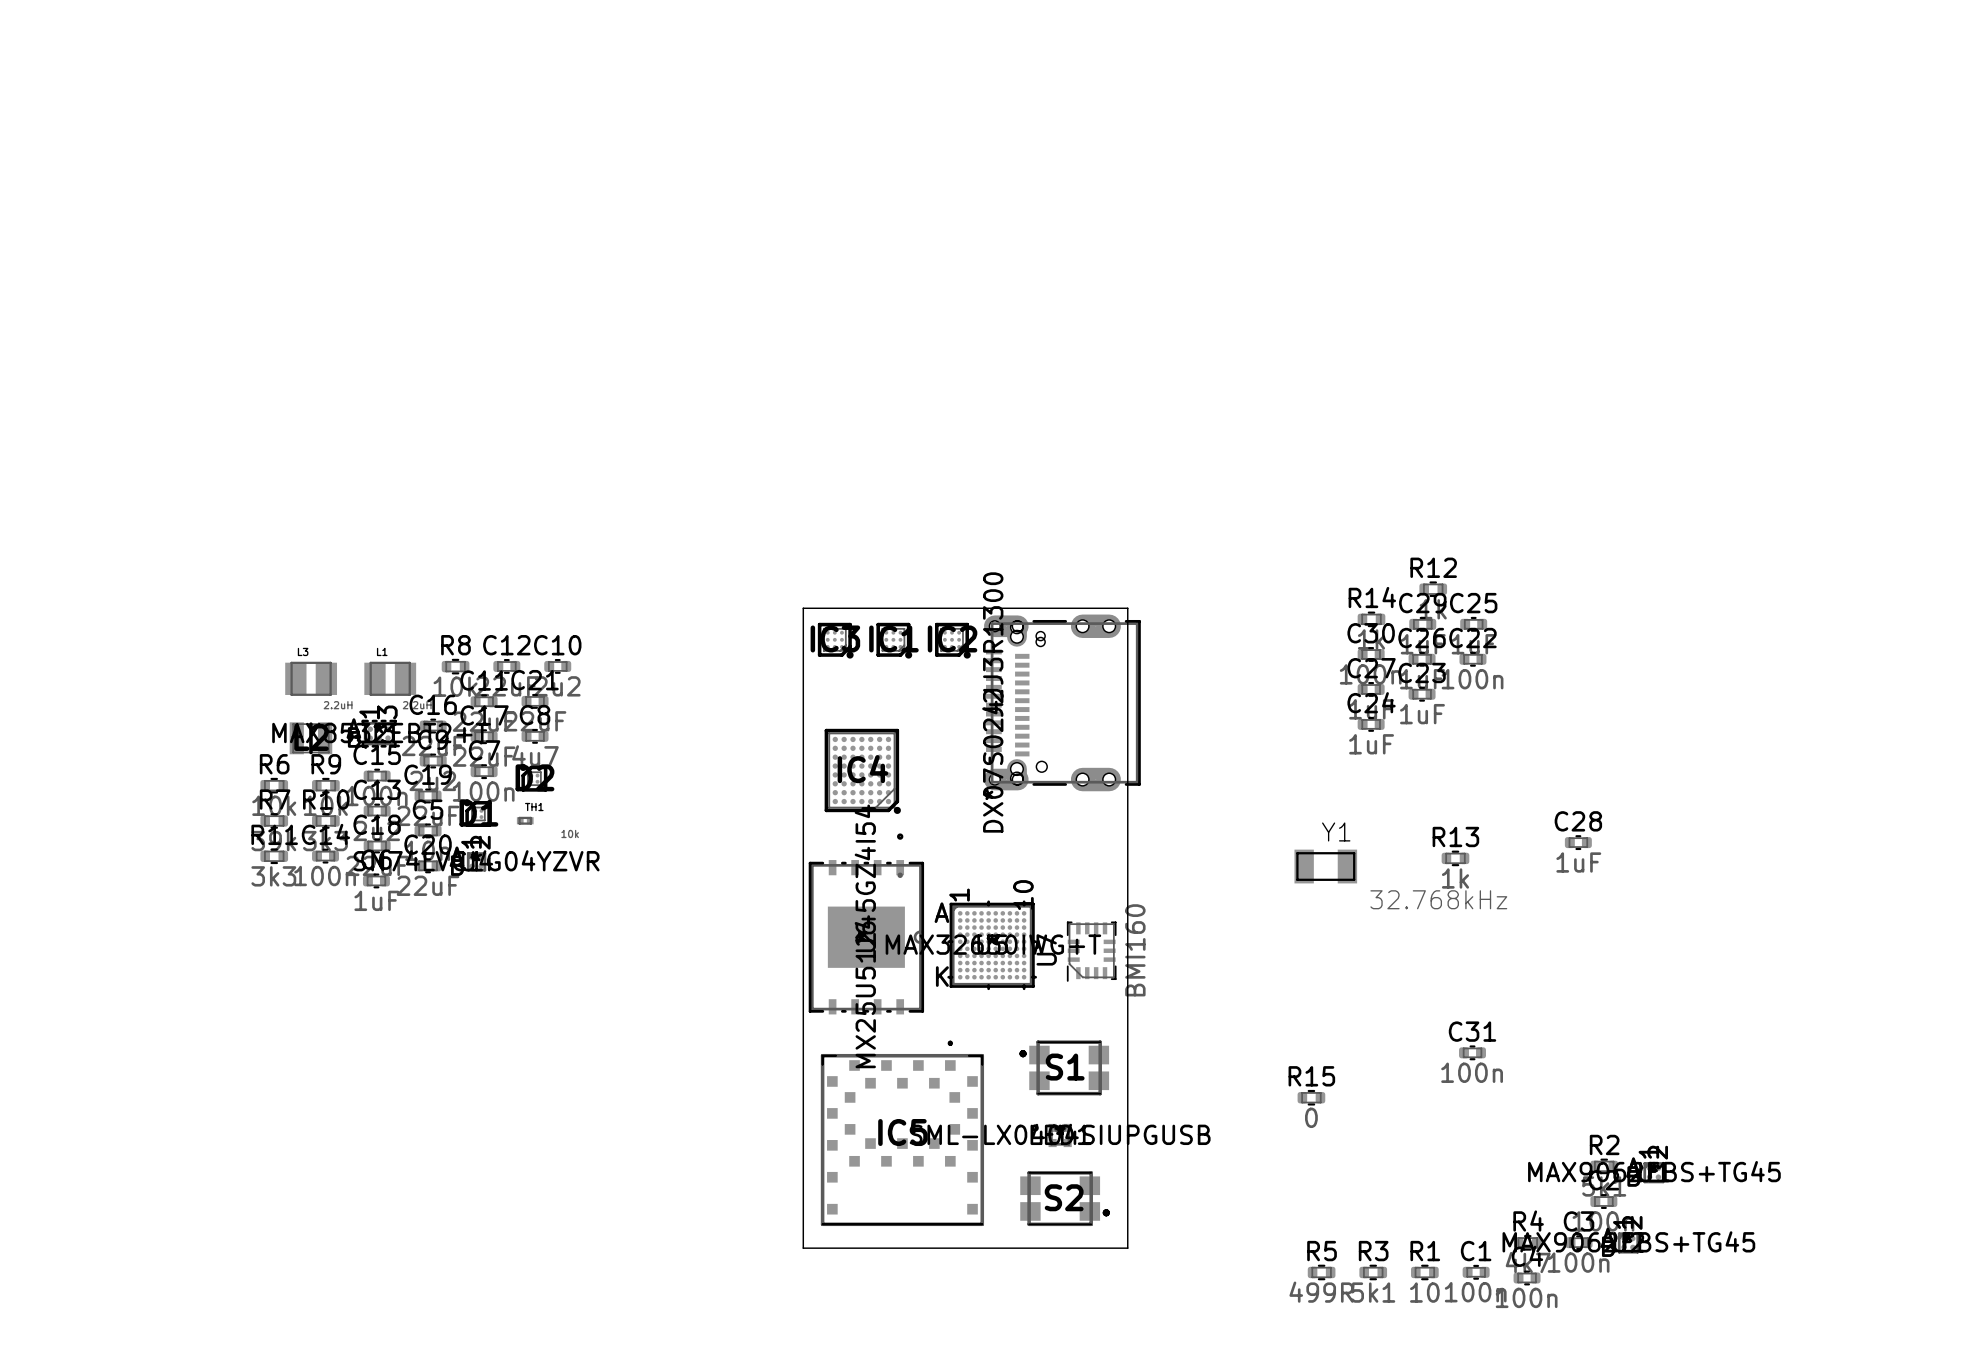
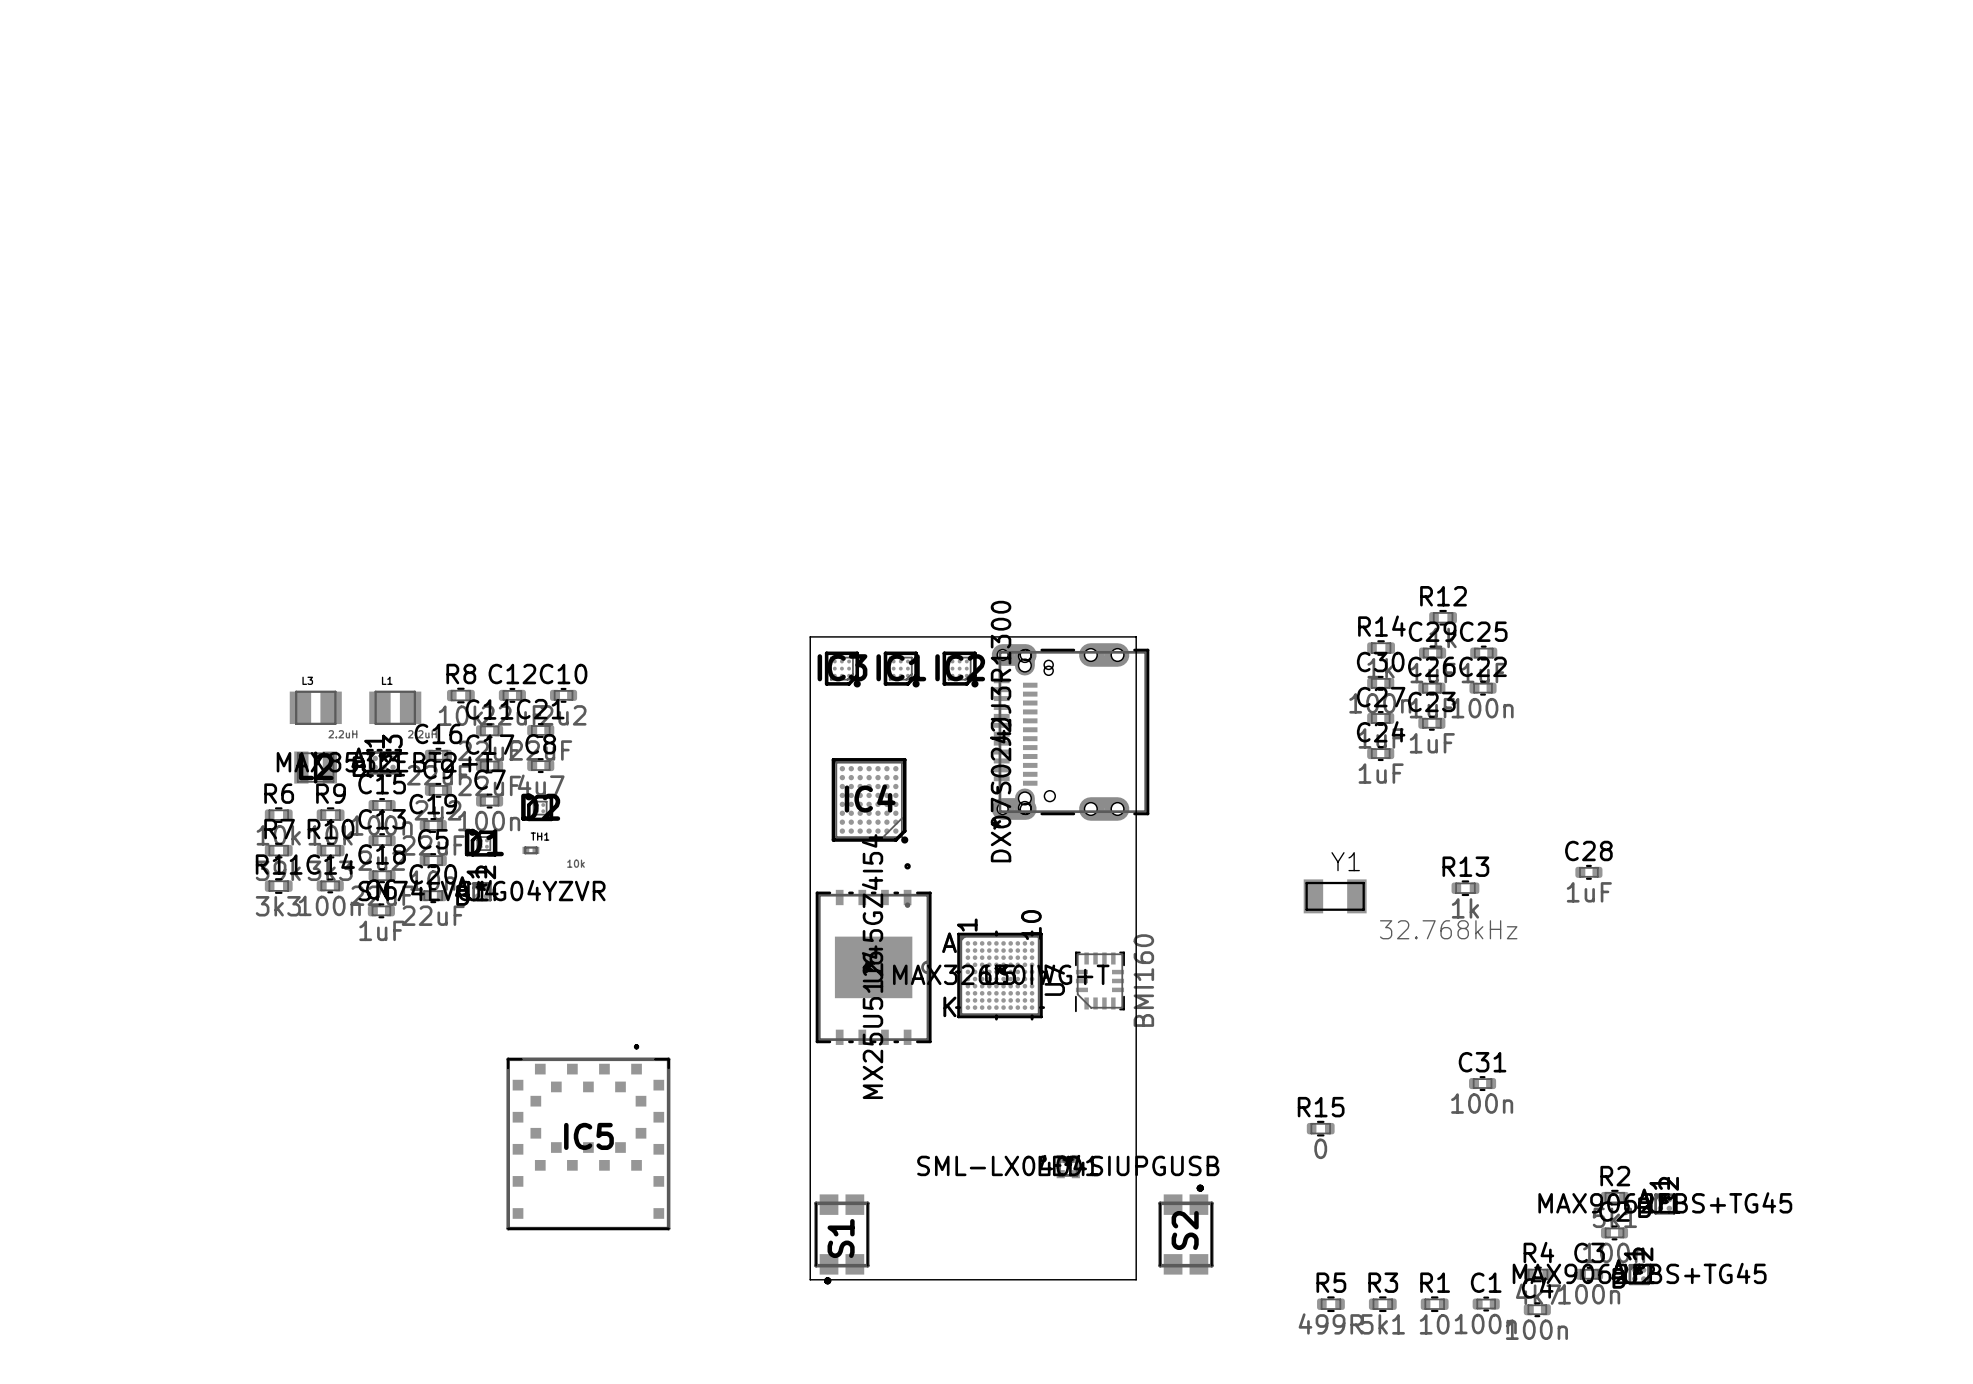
S1 rotation: 0° (1064, 1067) -> 90° counterclockwise (841, 1239)
S1 position: (1064, 1067) -> (841, 1239)
IC5 position: (902, 1133) -> (588, 1137)
S2 rotation: 0° (1065, 1198) -> 90° counterclockwise (1185, 1229)
S2 position: (1065, 1198) -> (1185, 1229)

